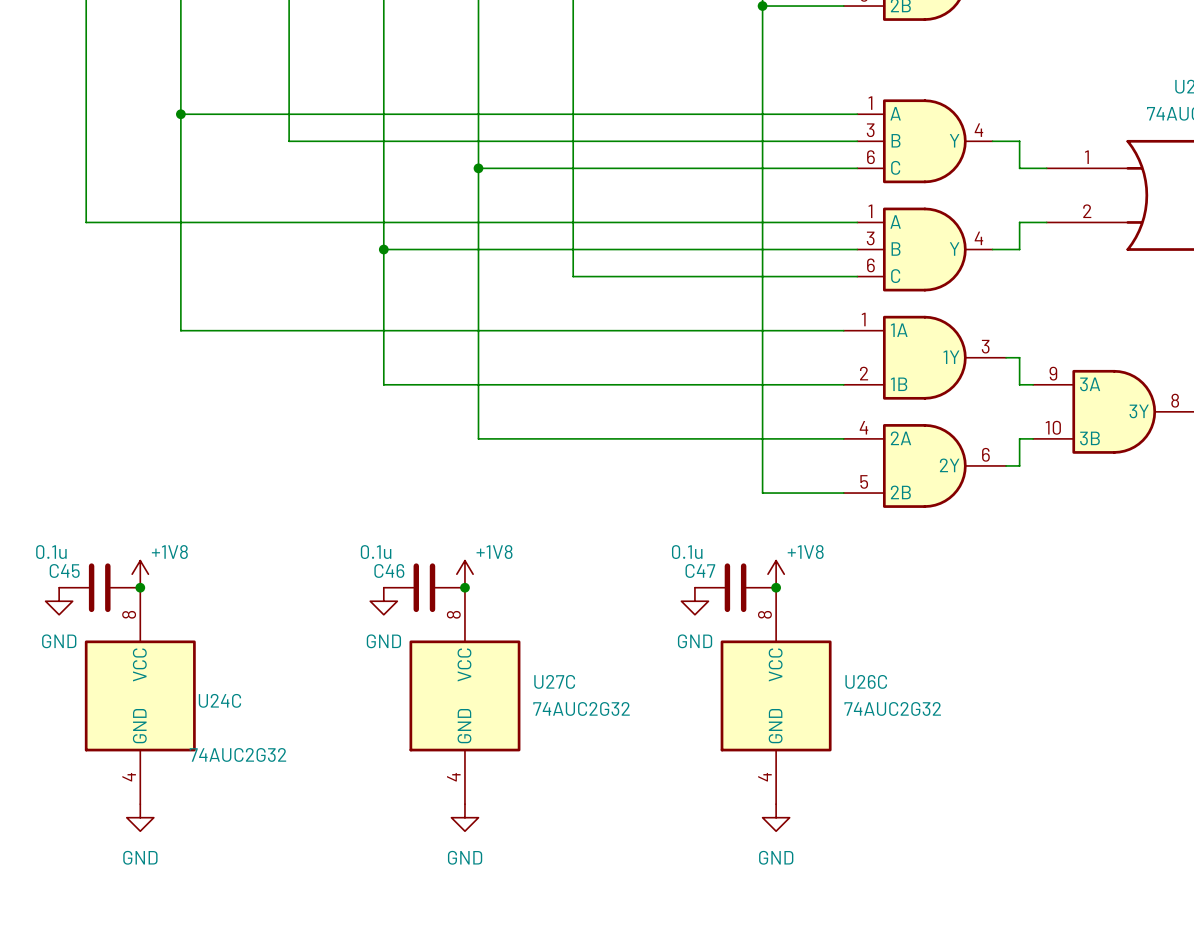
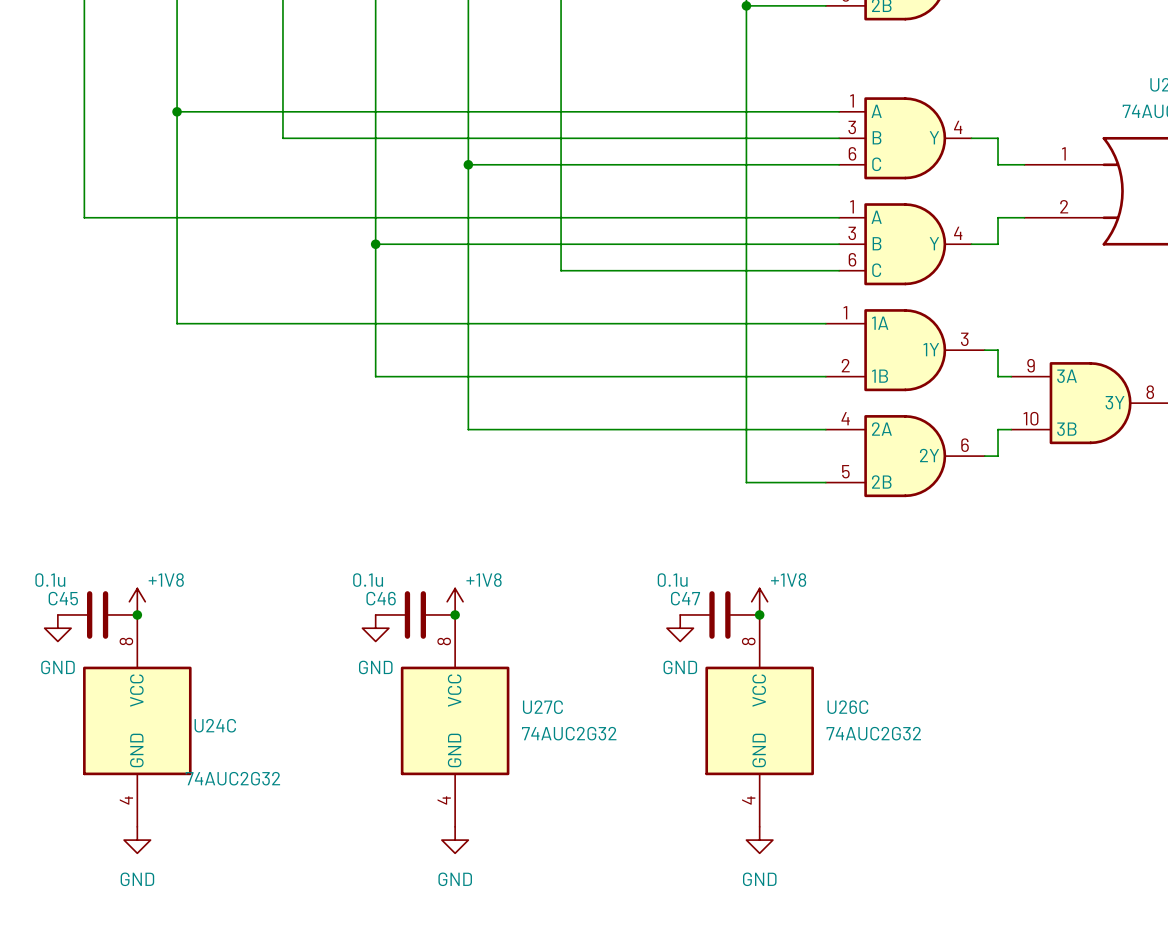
power symbol position: +1V8 (140, 574) -> +1V8 (137, 601)
power symbol position: +1V8 (464, 574) -> +1V8 (455, 601)
power symbol position: +1V8 (776, 574) -> +1V8 (759, 601)
C45 position: (99, 587) -> (97, 614)
junction position: (140, 587) -> (137, 614)
C46 position: (424, 587) -> (415, 614)
junction position: (464, 587) -> (455, 614)
C47 position: (735, 587) -> (719, 614)
junction position: (776, 587) -> (759, 614)
power symbol position: GND (59, 601) -> GND (57, 628)
power symbol position: GND (383, 601) -> GND (375, 628)
power symbol position: GND (694, 601) -> GND (680, 628)
U24C position: (140, 695) -> (137, 720)
U27C position: (464, 695) -> (455, 720)
U26C position: (776, 695) -> (759, 720)
power symbol position: GND (140, 817) -> GND (137, 840)
power symbol position: GND (464, 817) -> GND (455, 840)
power symbol position: GND (776, 817) -> GND (759, 840)

